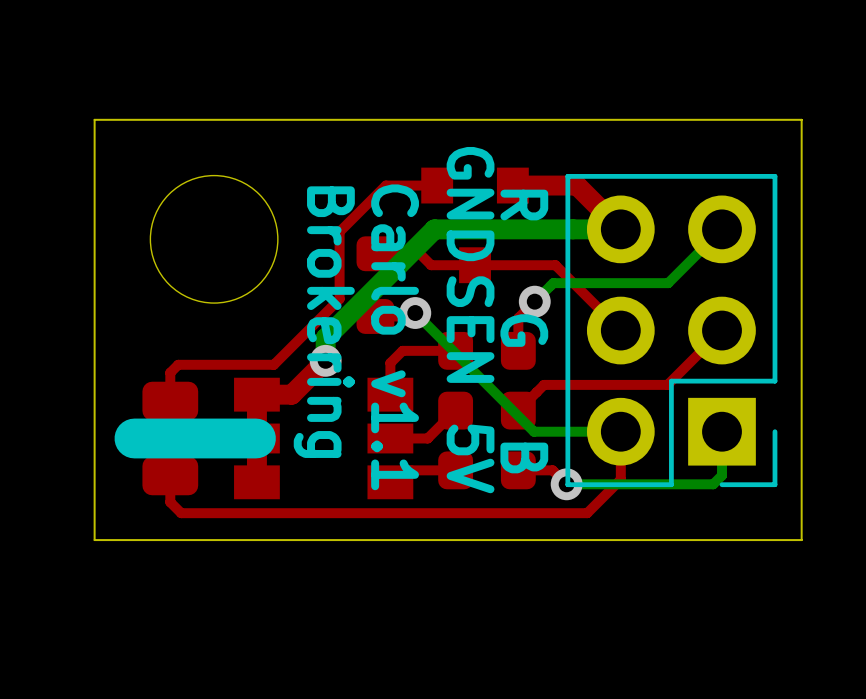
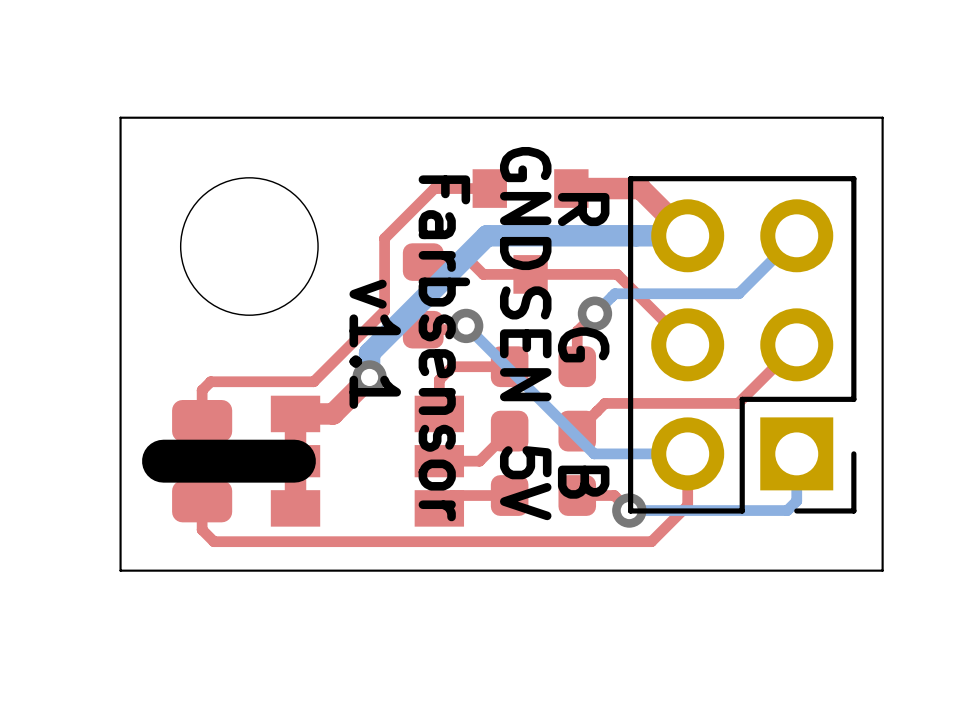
text: Brokering (324, 322) -> none
text: none -> v1.1 (375, 344)
text: none -> Farbsensor (444, 348)
text: Carlo v1.1 (395, 337) -> none

